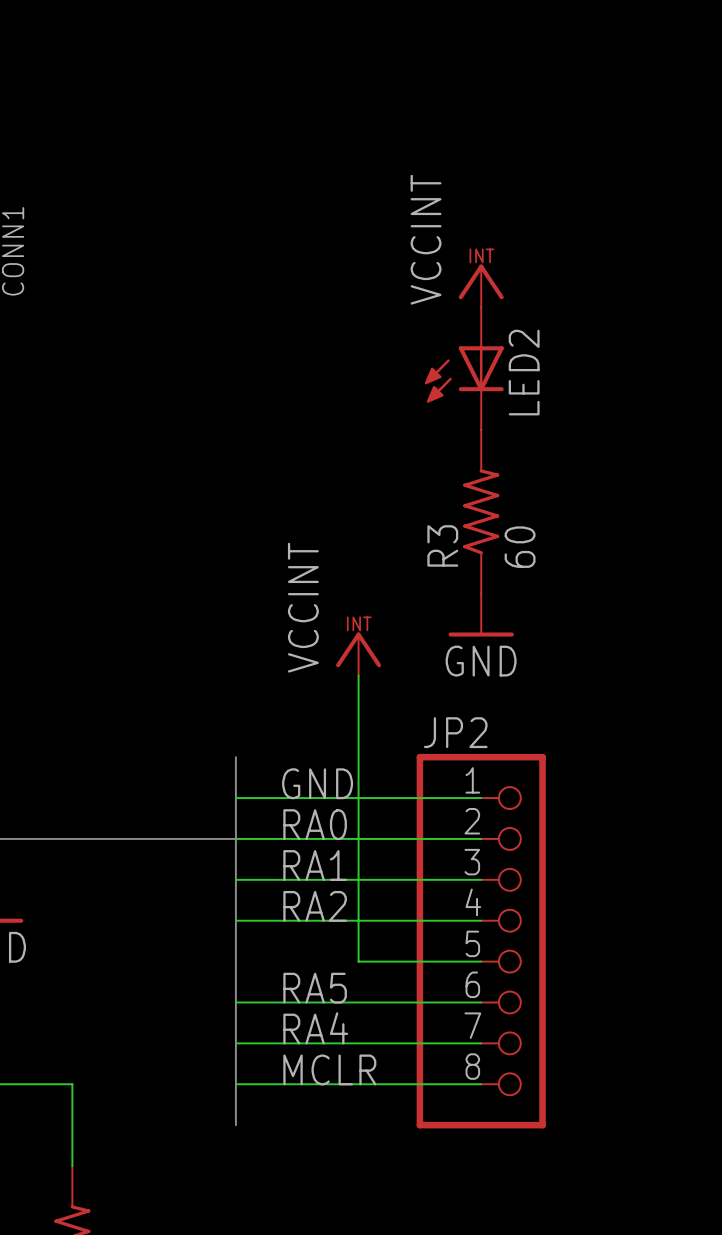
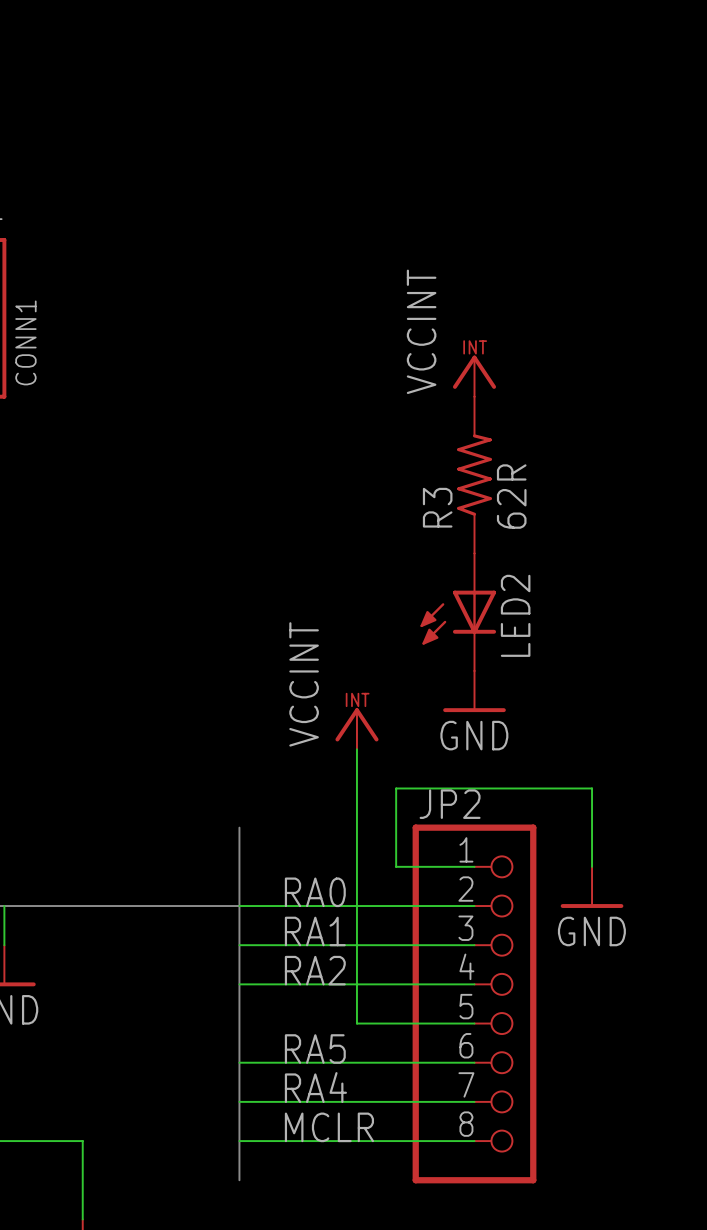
LED2 position: (464, 368) -> (458, 612)
R3 position: (481, 511) -> (474, 475)
R3 value: 60 (520, 547) -> 62R (511, 496)
label: GND (317, 783) -> none
wire: (235, 798) (399, 798) -> (592, 866) (592, 788) (396, 788) (396, 866)
power symbol: none -> GND (592, 887)

